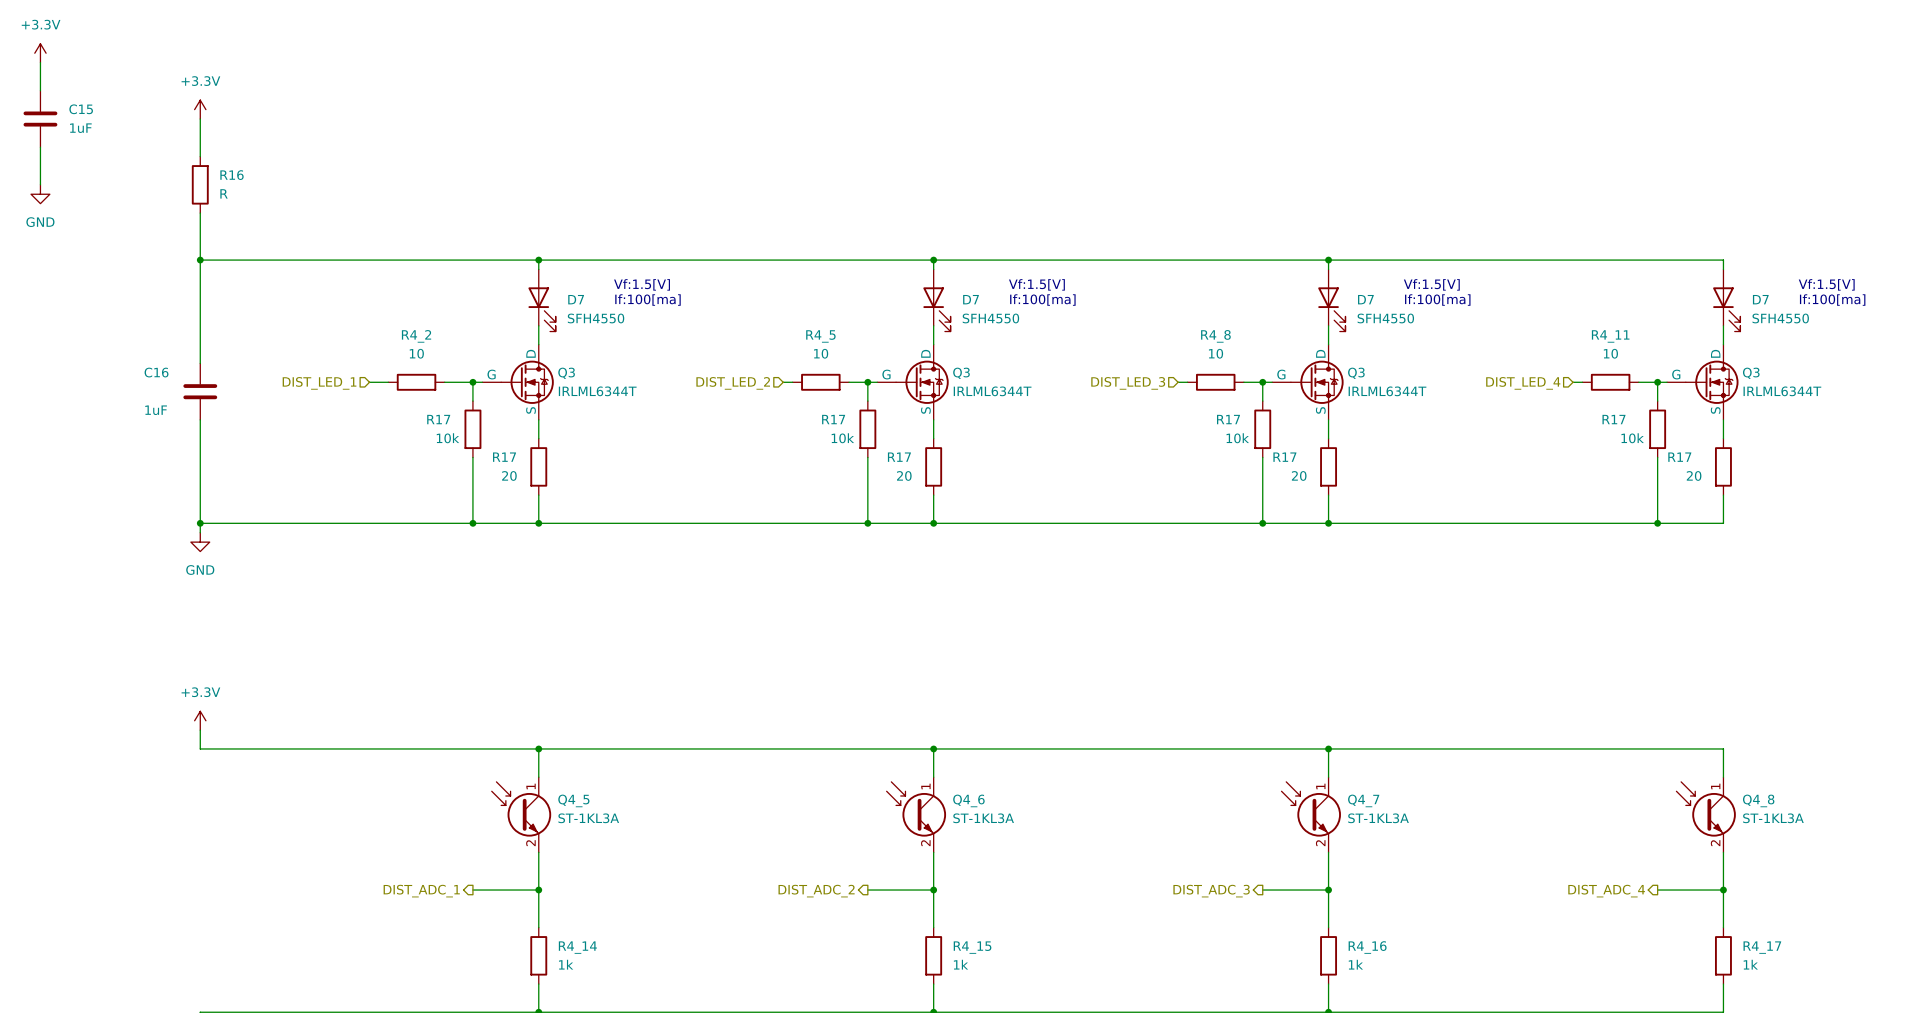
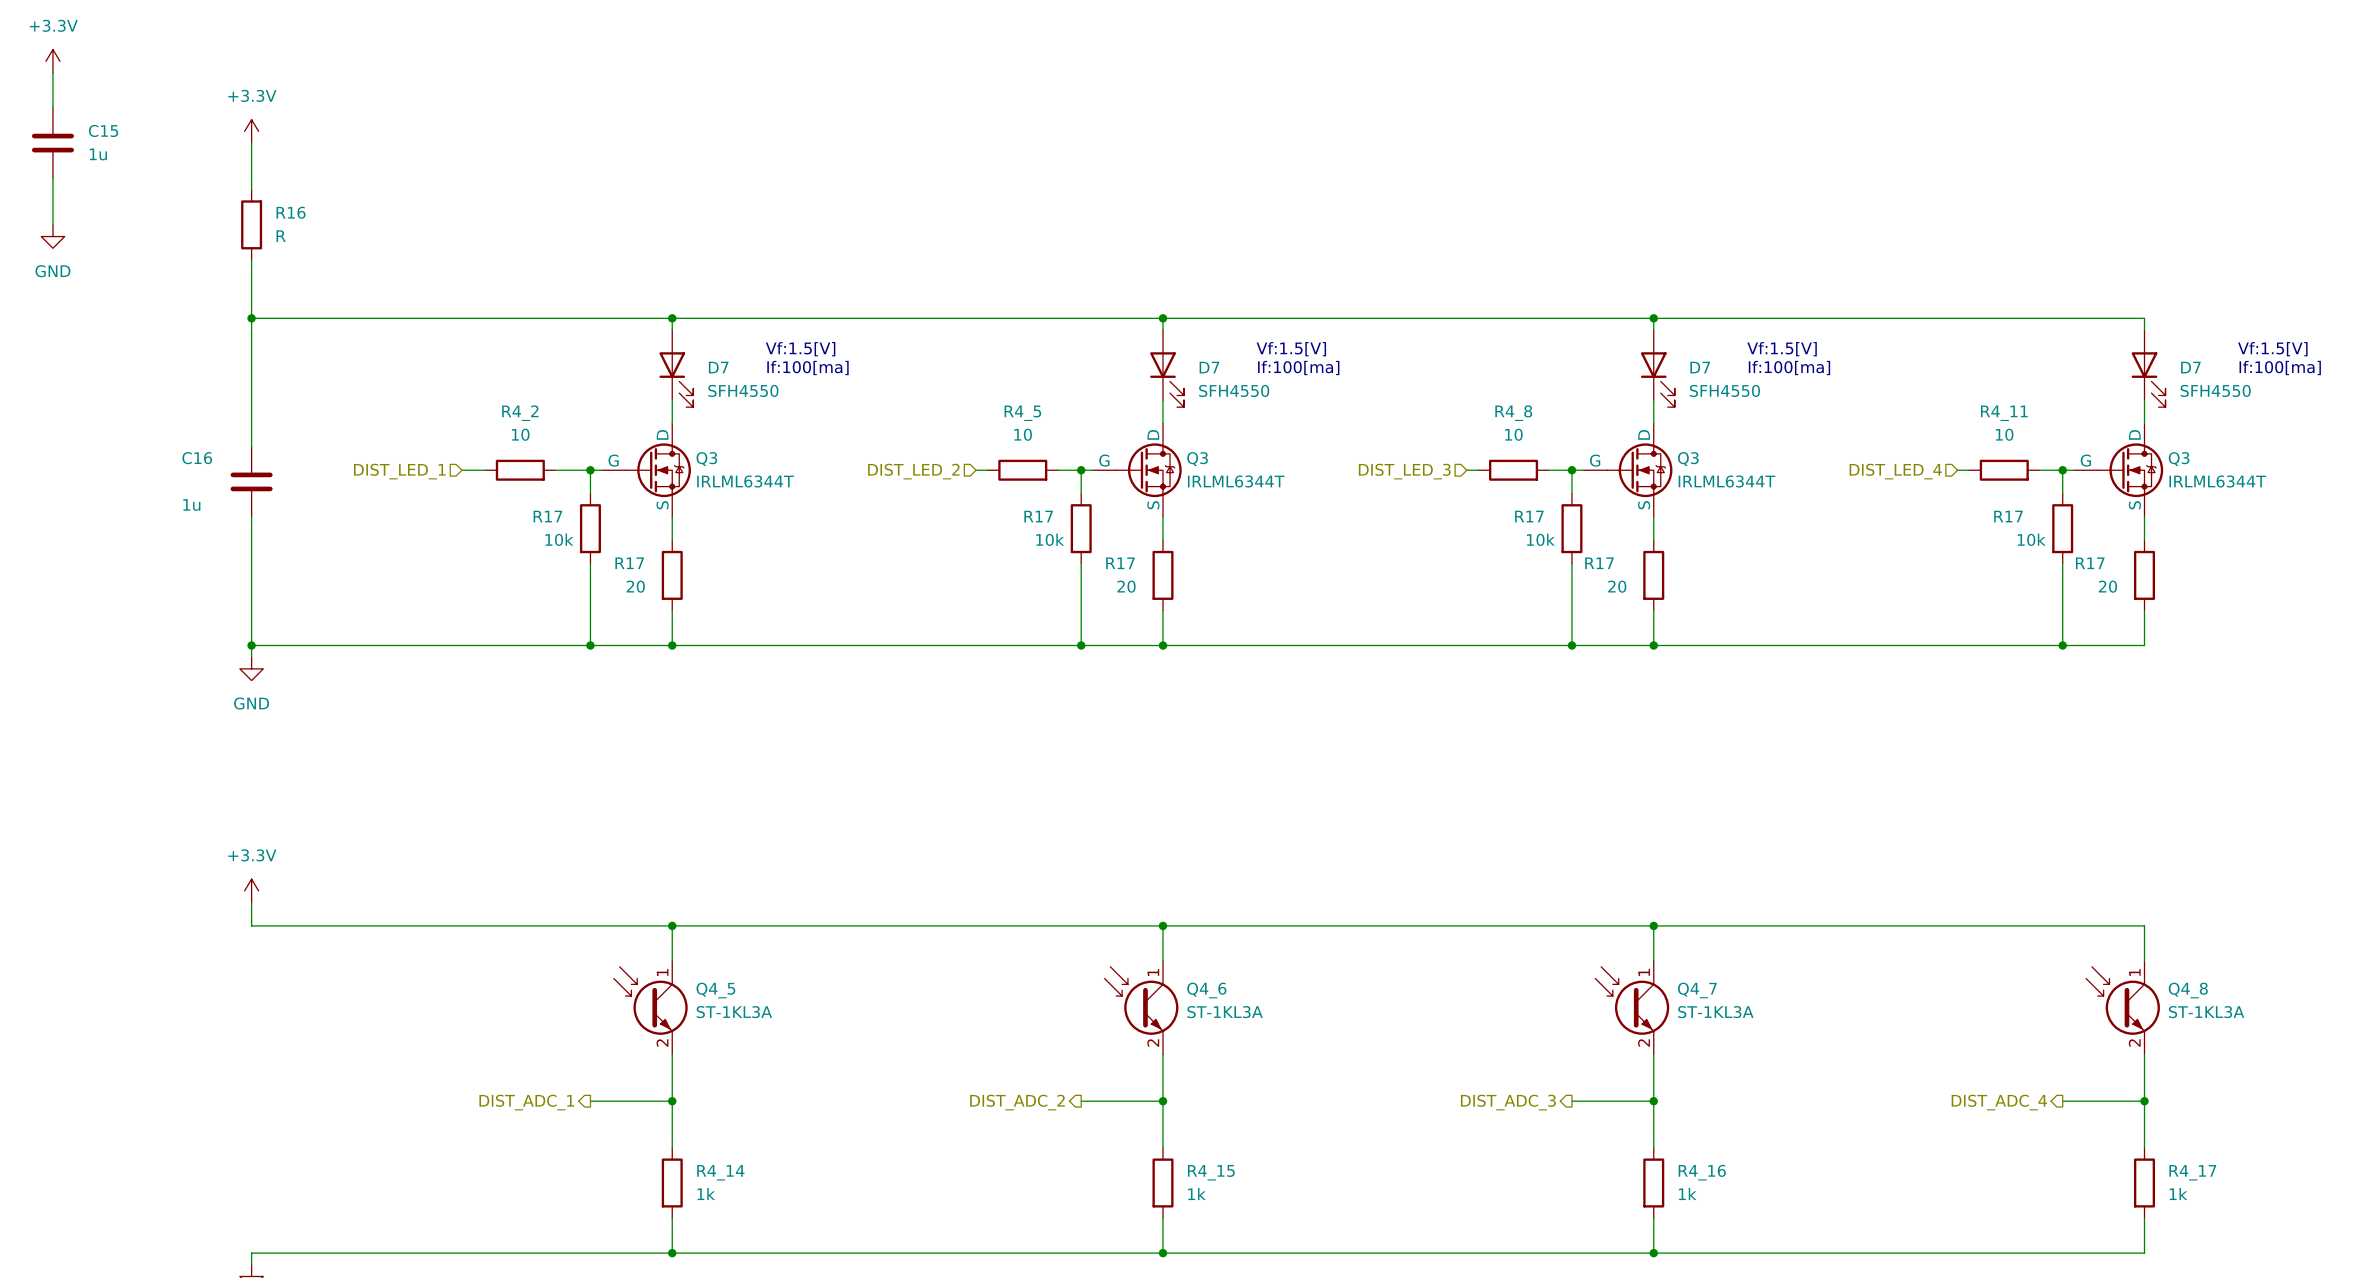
C15 value: 1uF (80, 128) -> 1u (98, 154)
C16 value: 1uF (156, 410) -> 1u (191, 504)

